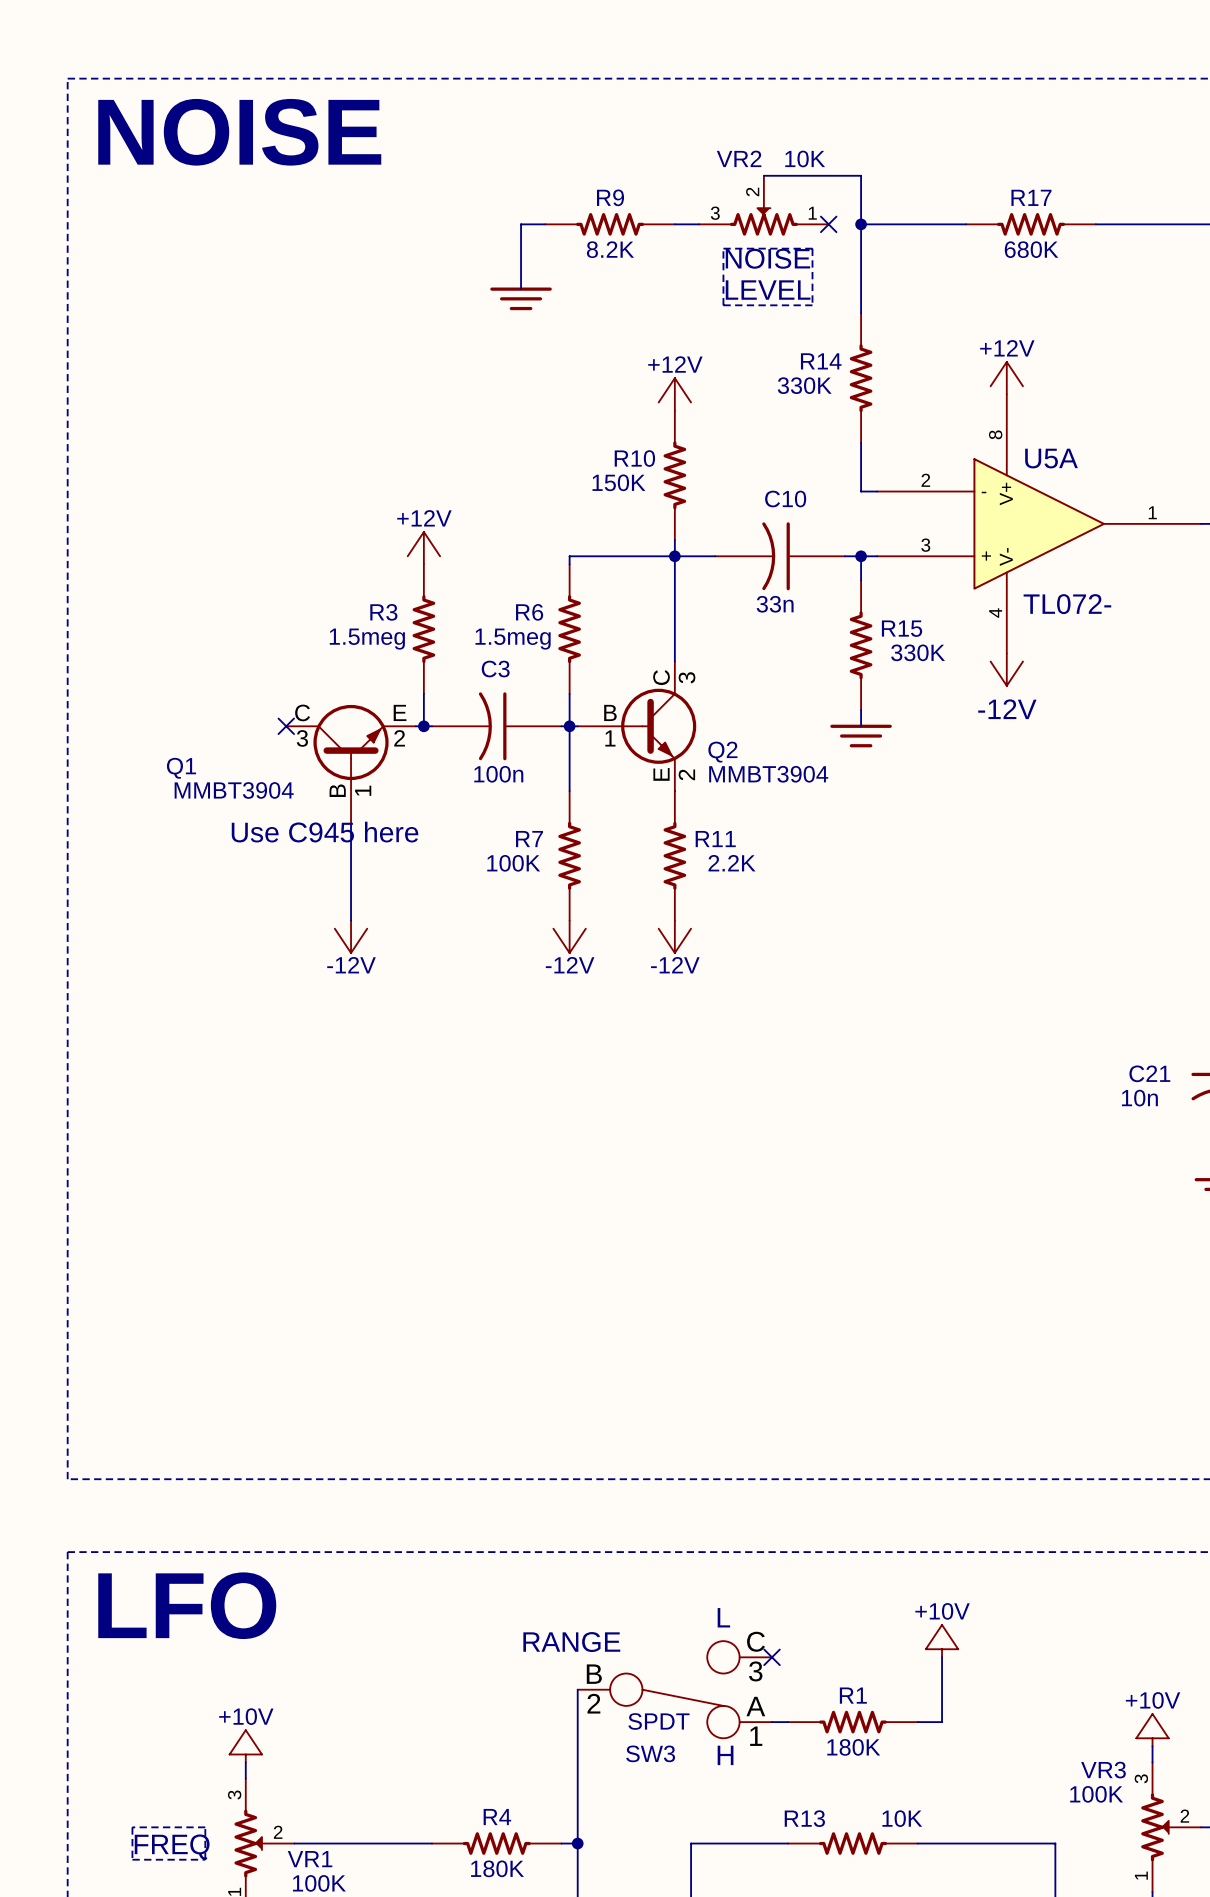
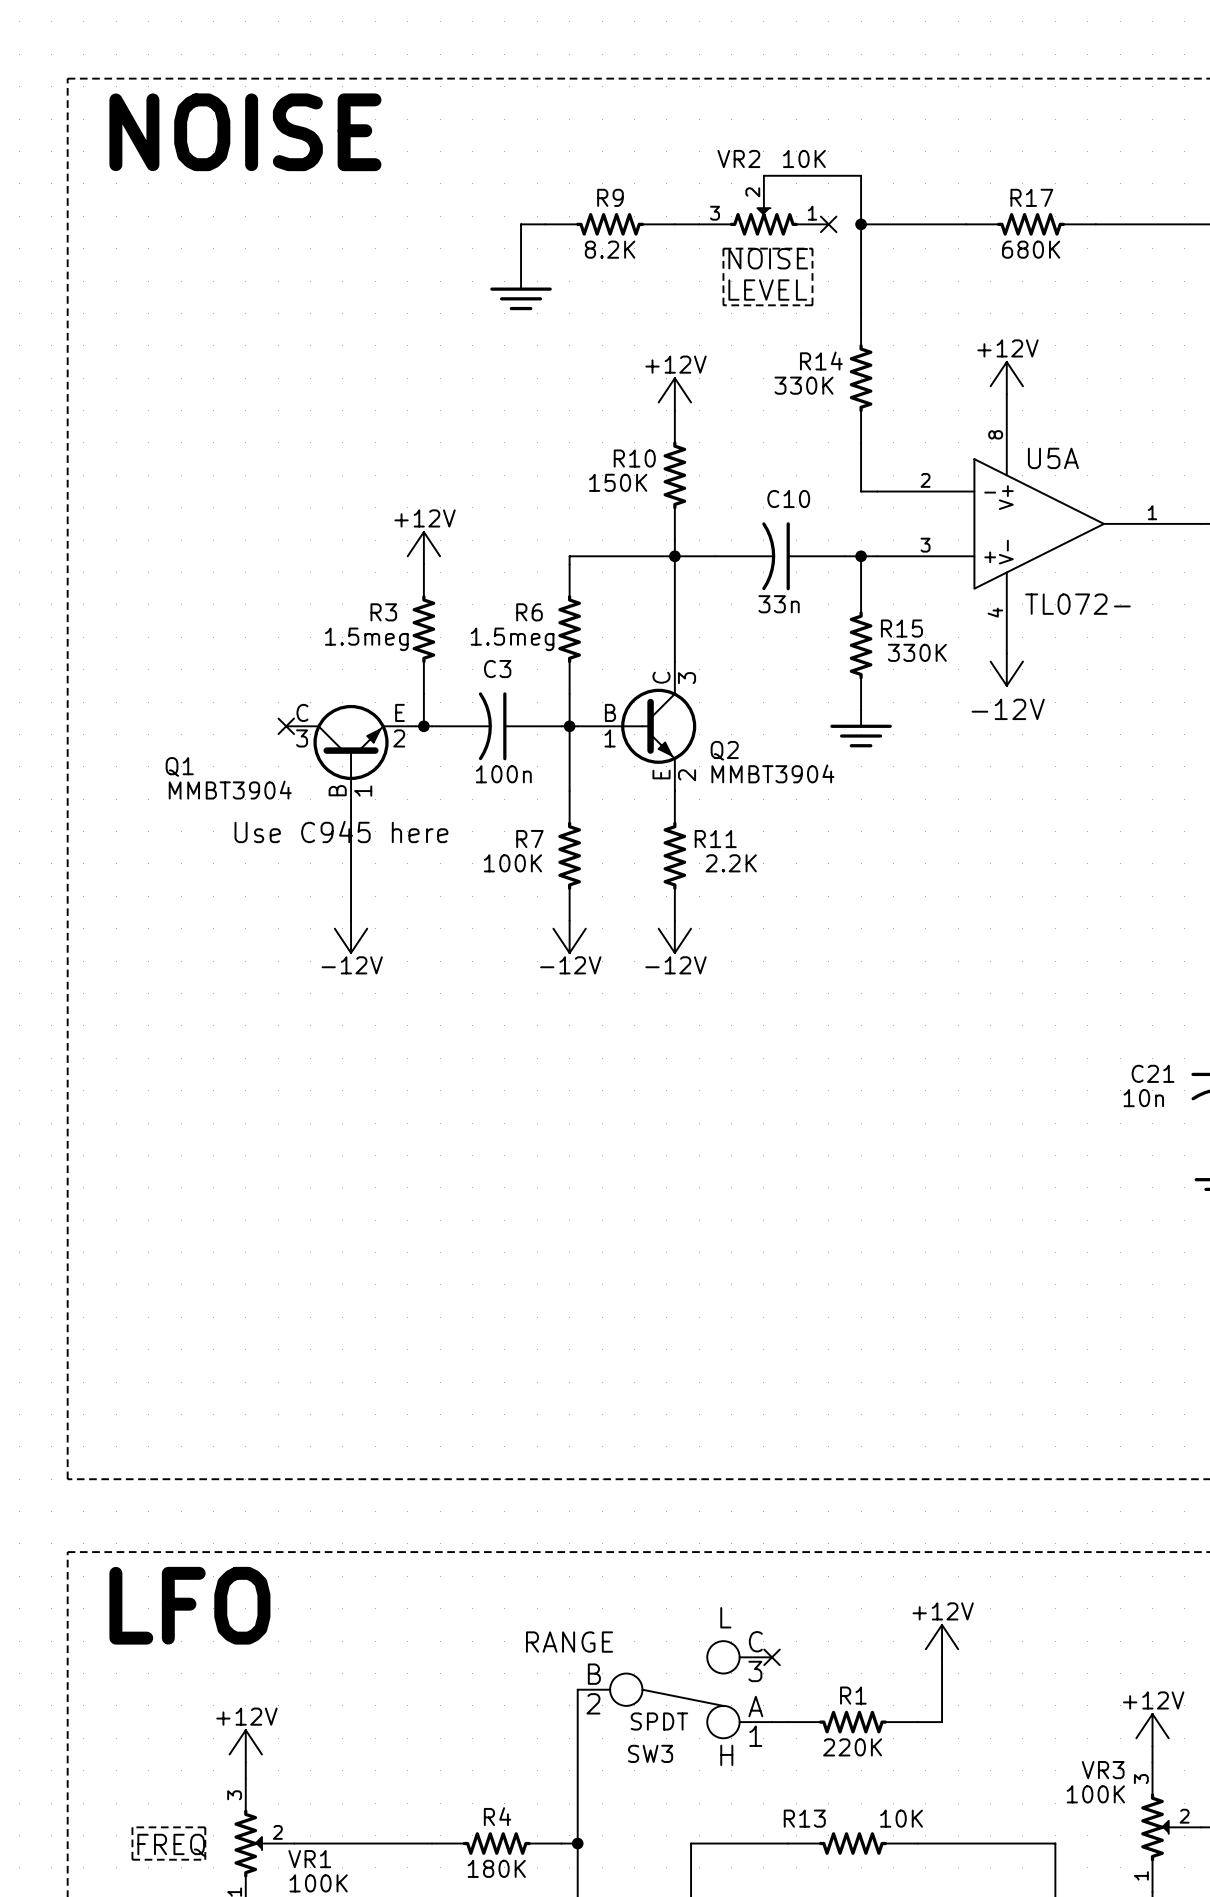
power symbol: +10V (942, 1641) -> +12V (942, 1641)
power symbol: +10V (1152, 1730) -> +12V (1152, 1730)
power symbol: +10V (245, 1746) -> +12V (245, 1746)
R1 value: 180K (853, 1747) -> 220K (852, 1747)

